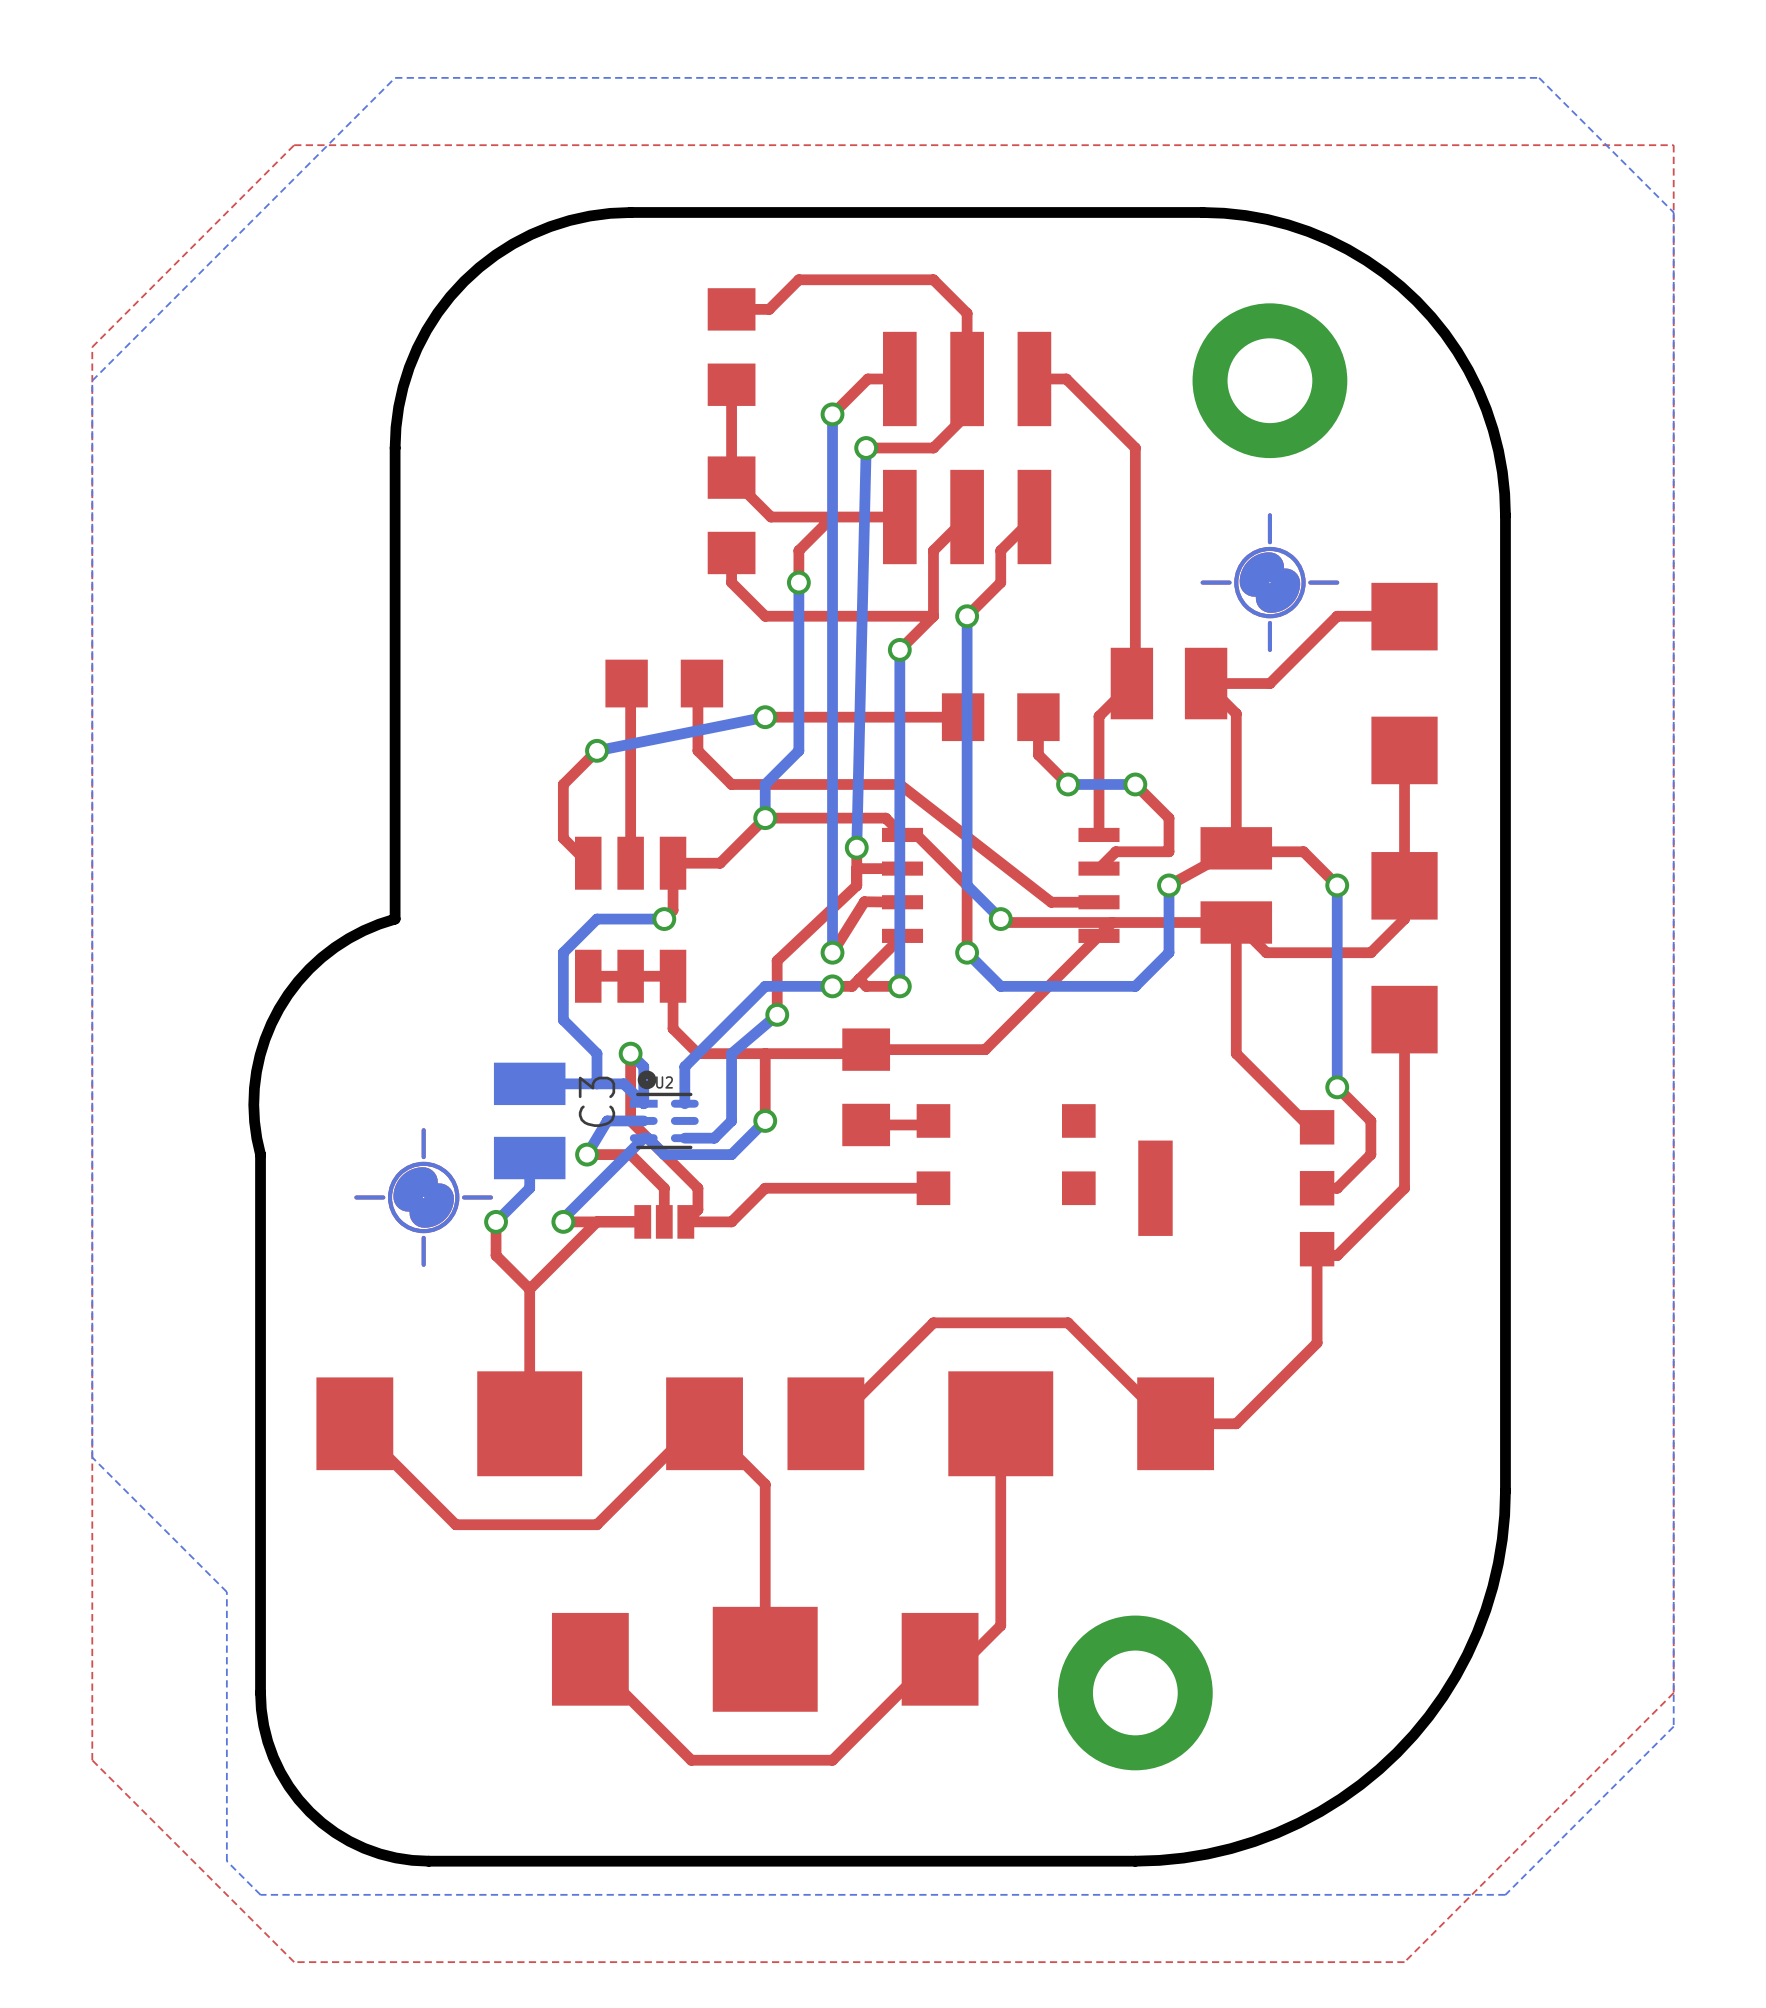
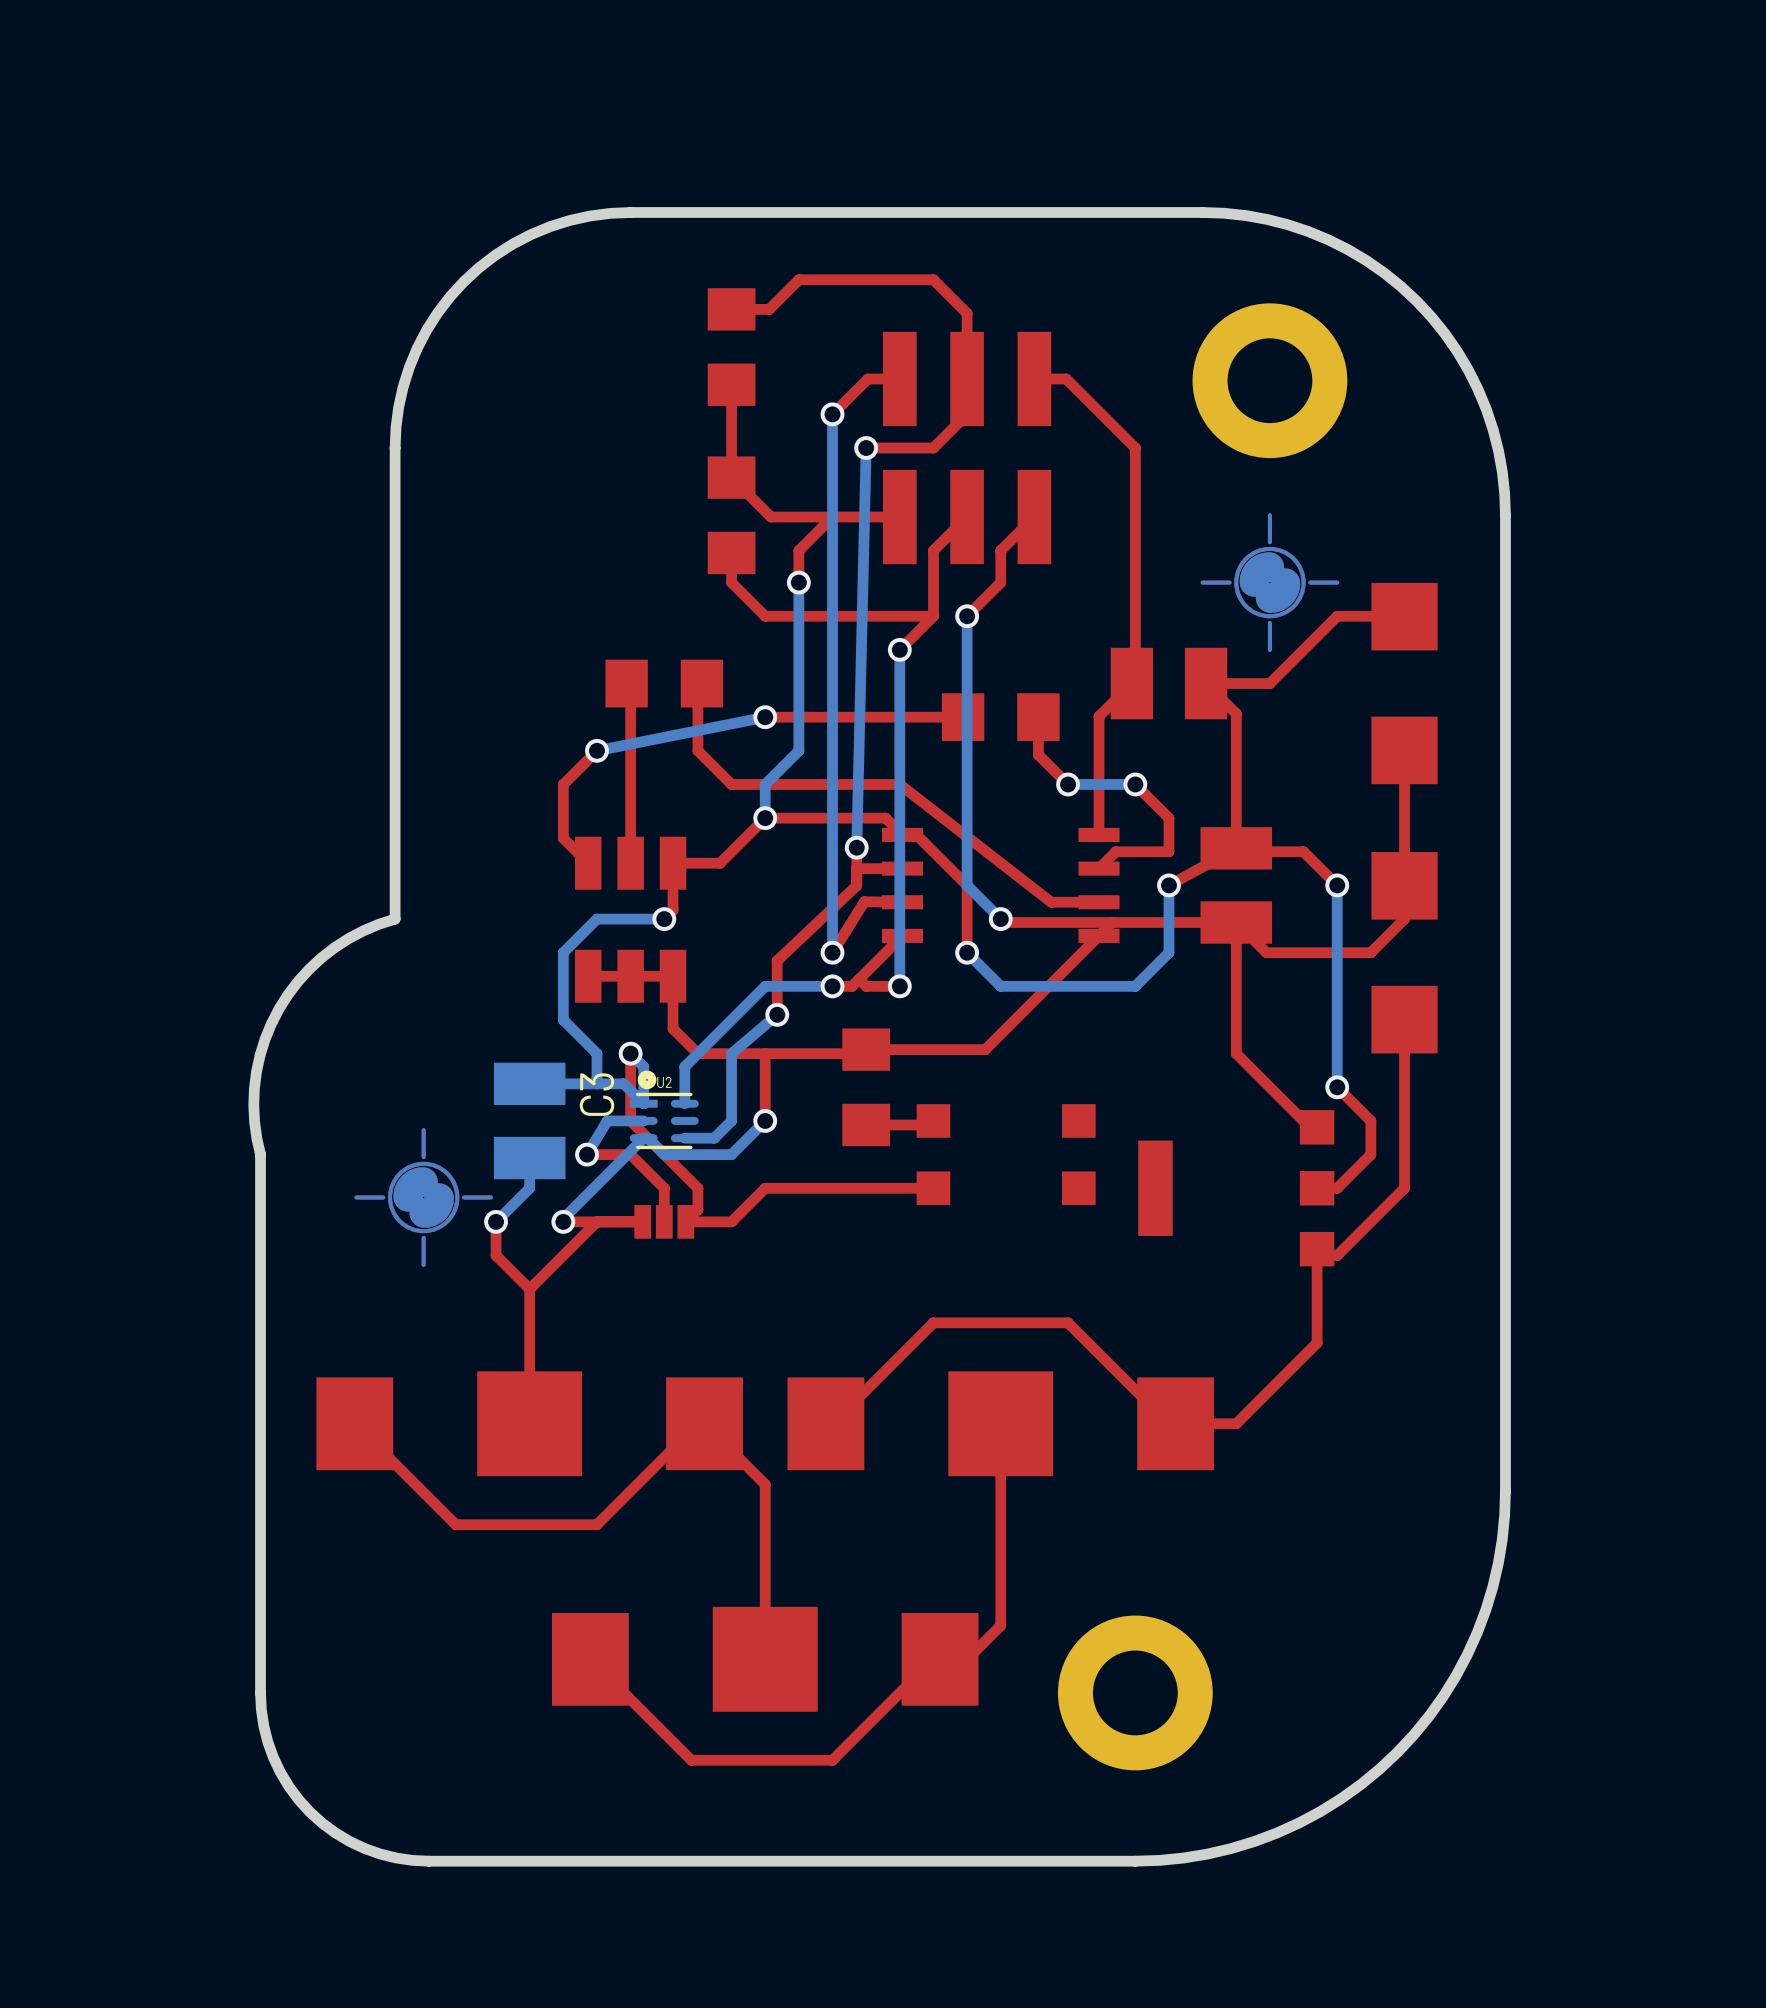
bottom zone outline: (1539, 77) (395, 77) (92, 380) (92, 1457) (226, 1592) (226, 1861) (260, 1894) (1505, 1894) (1673, 1726) (1673, 212) (1539, 77) -> none
top zone outline: (1673, 145) (1673, 1692) (1404, 1962) (294, 1962) (92, 1760) (92, 347) (294, 145) (1673, 145) -> none

